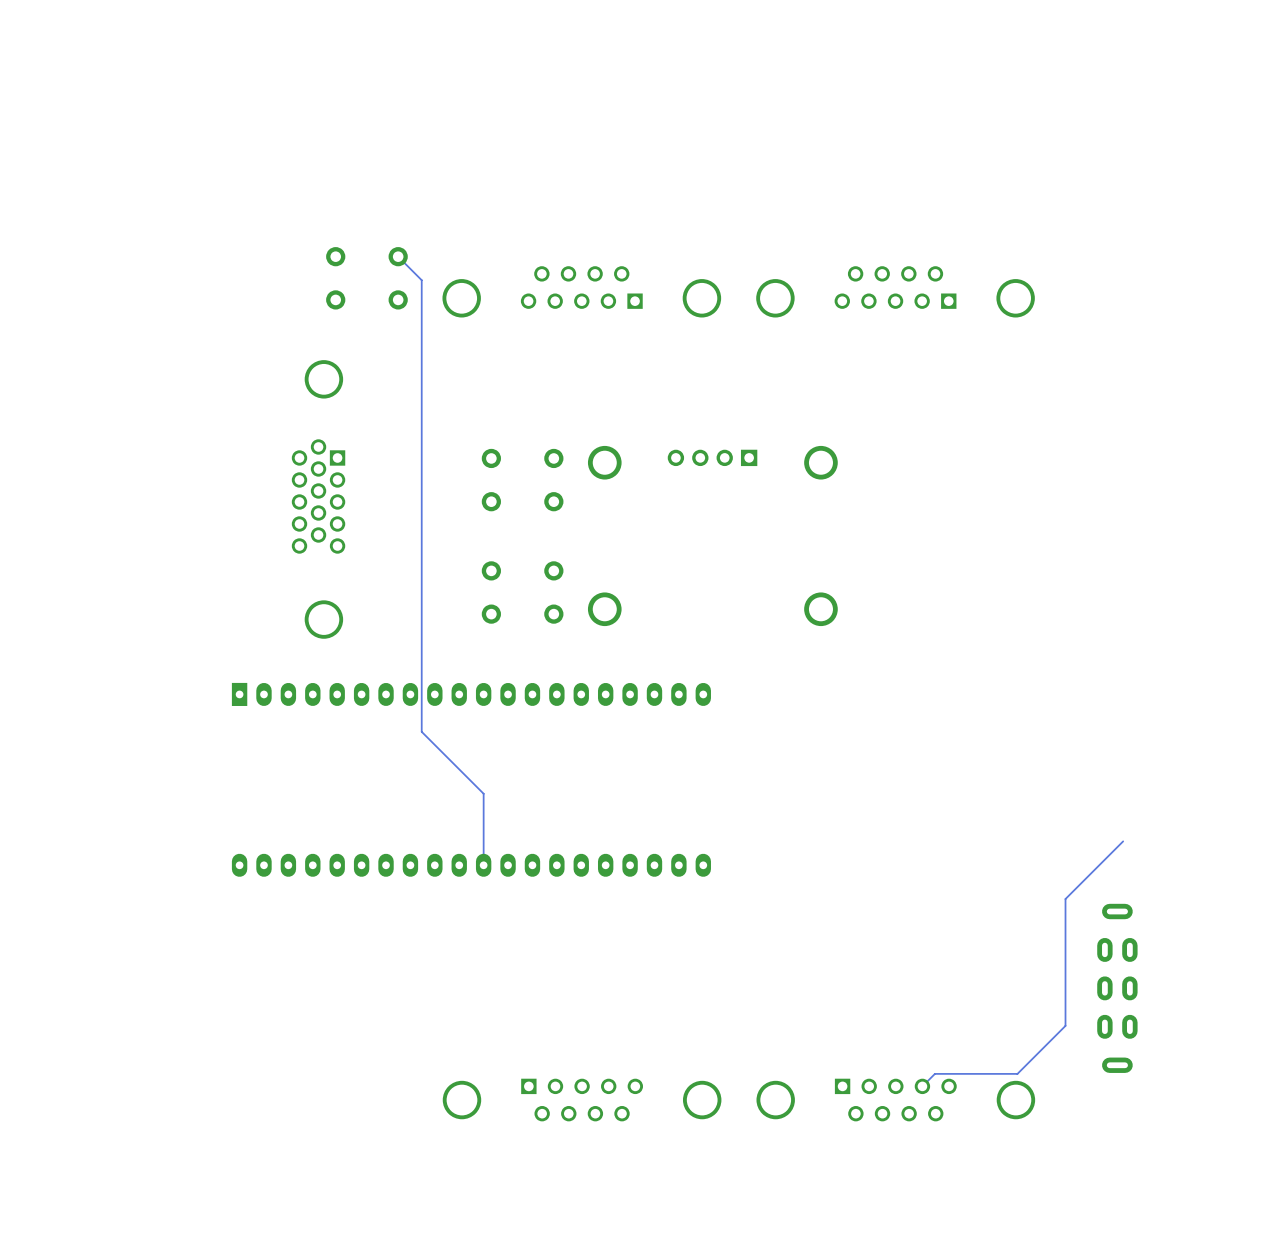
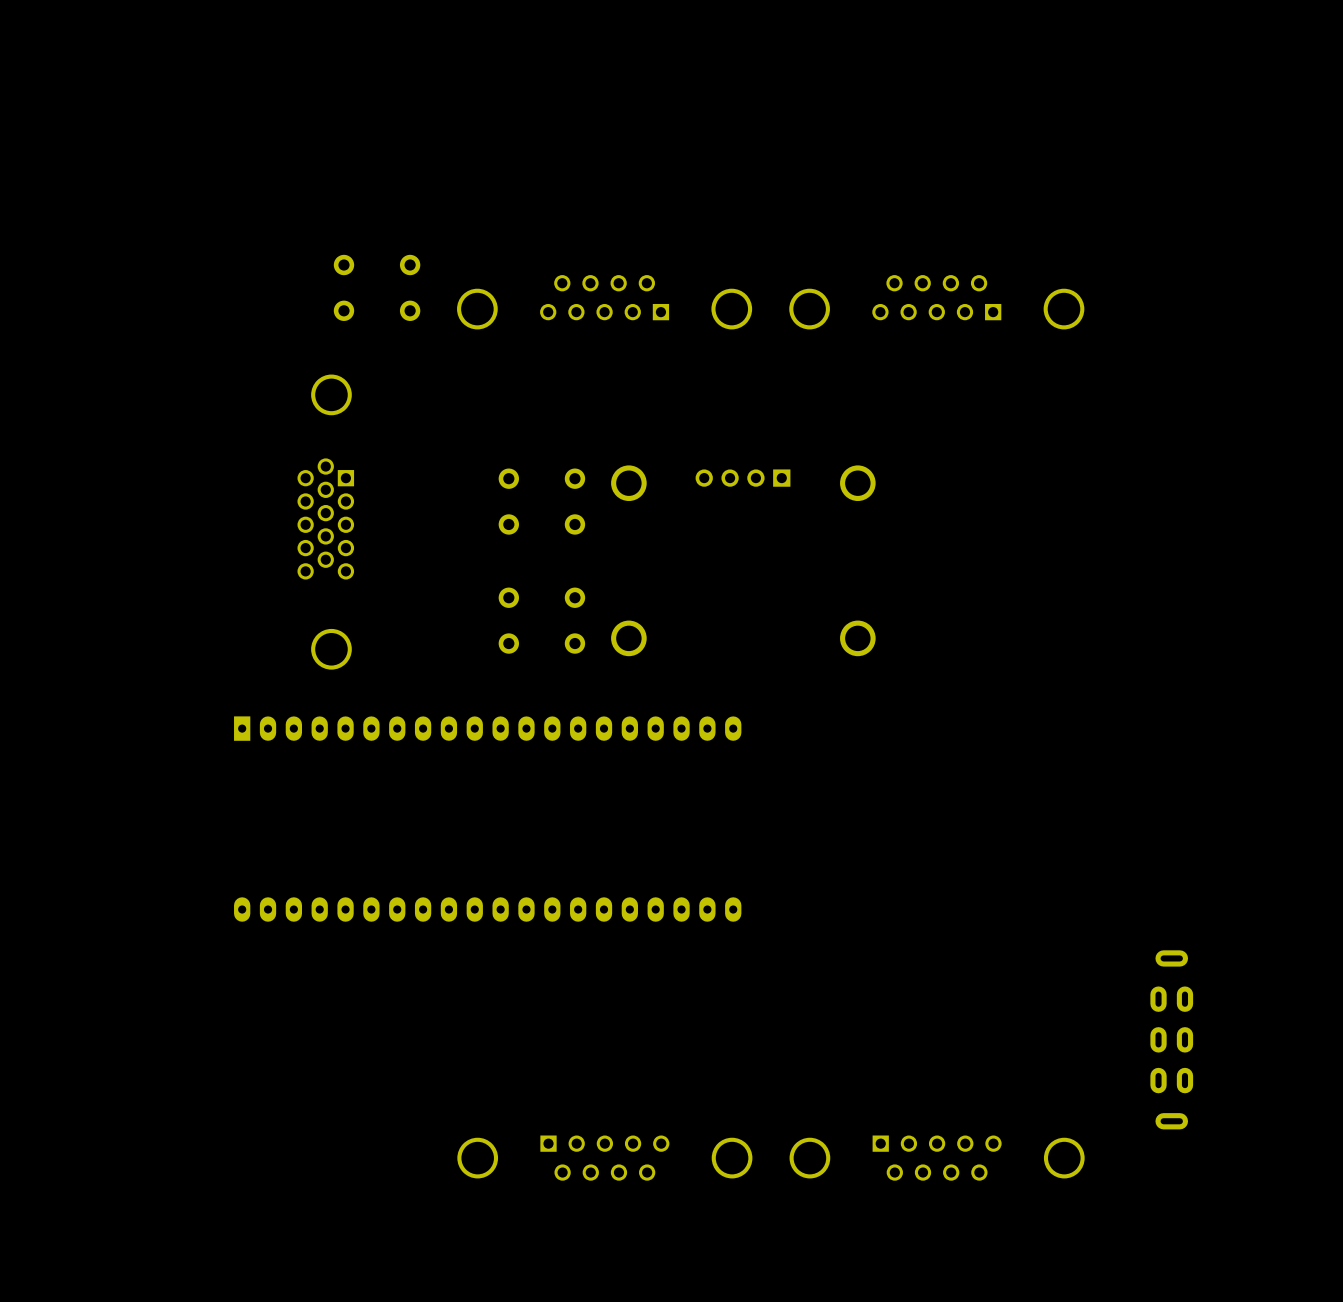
track: (398, 256) (421, 280) (421, 731) (483, 793) (483, 865) -> none
track: (1123, 841) (1065, 899) (1065, 1025) (1017, 1073) (934, 1073) (922, 1086) -> none

